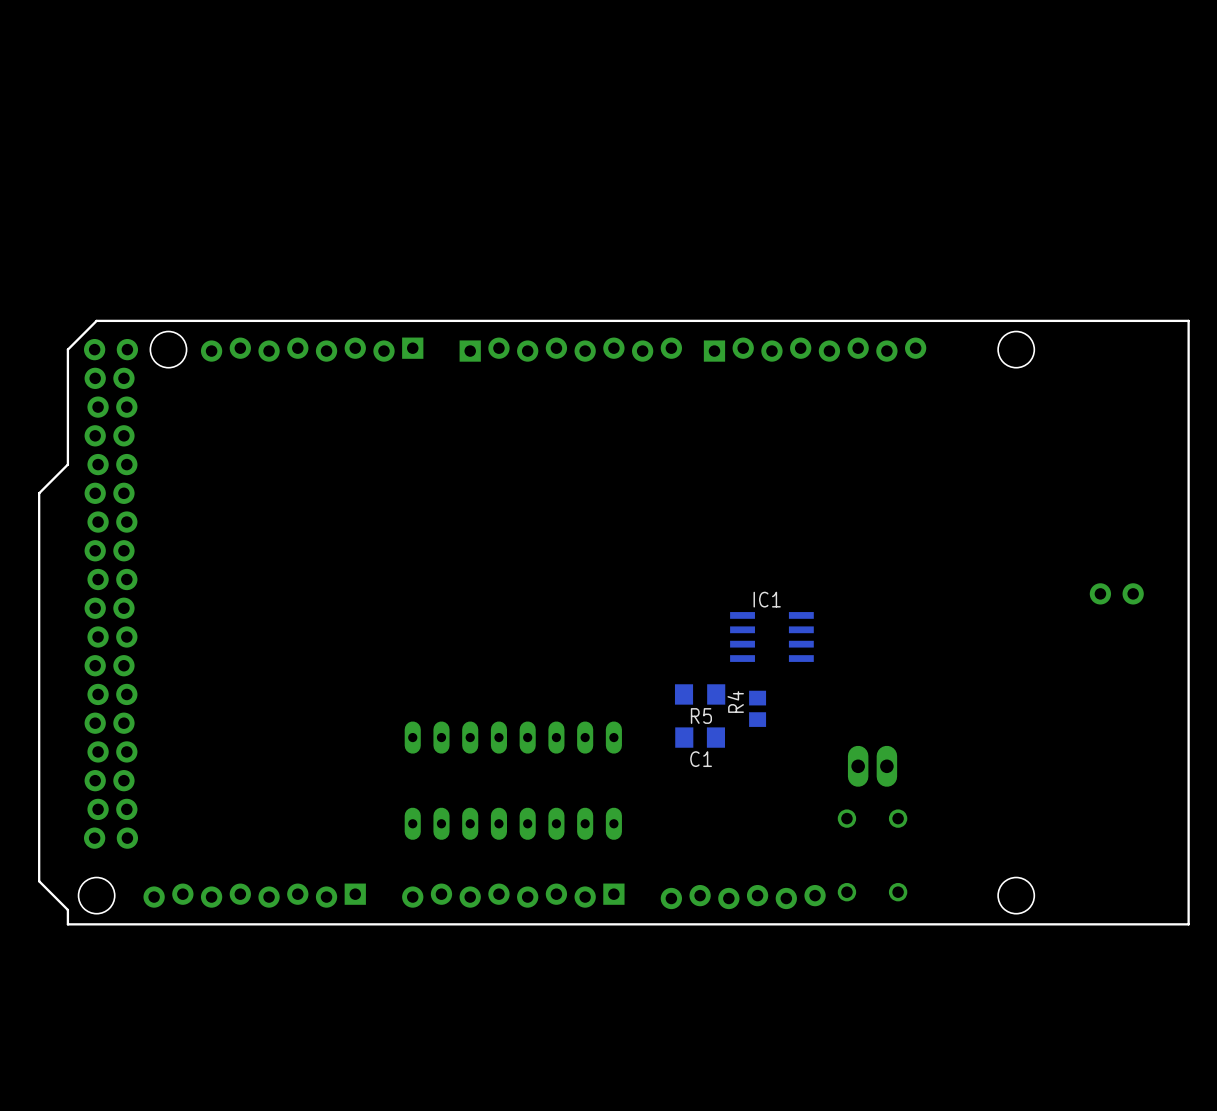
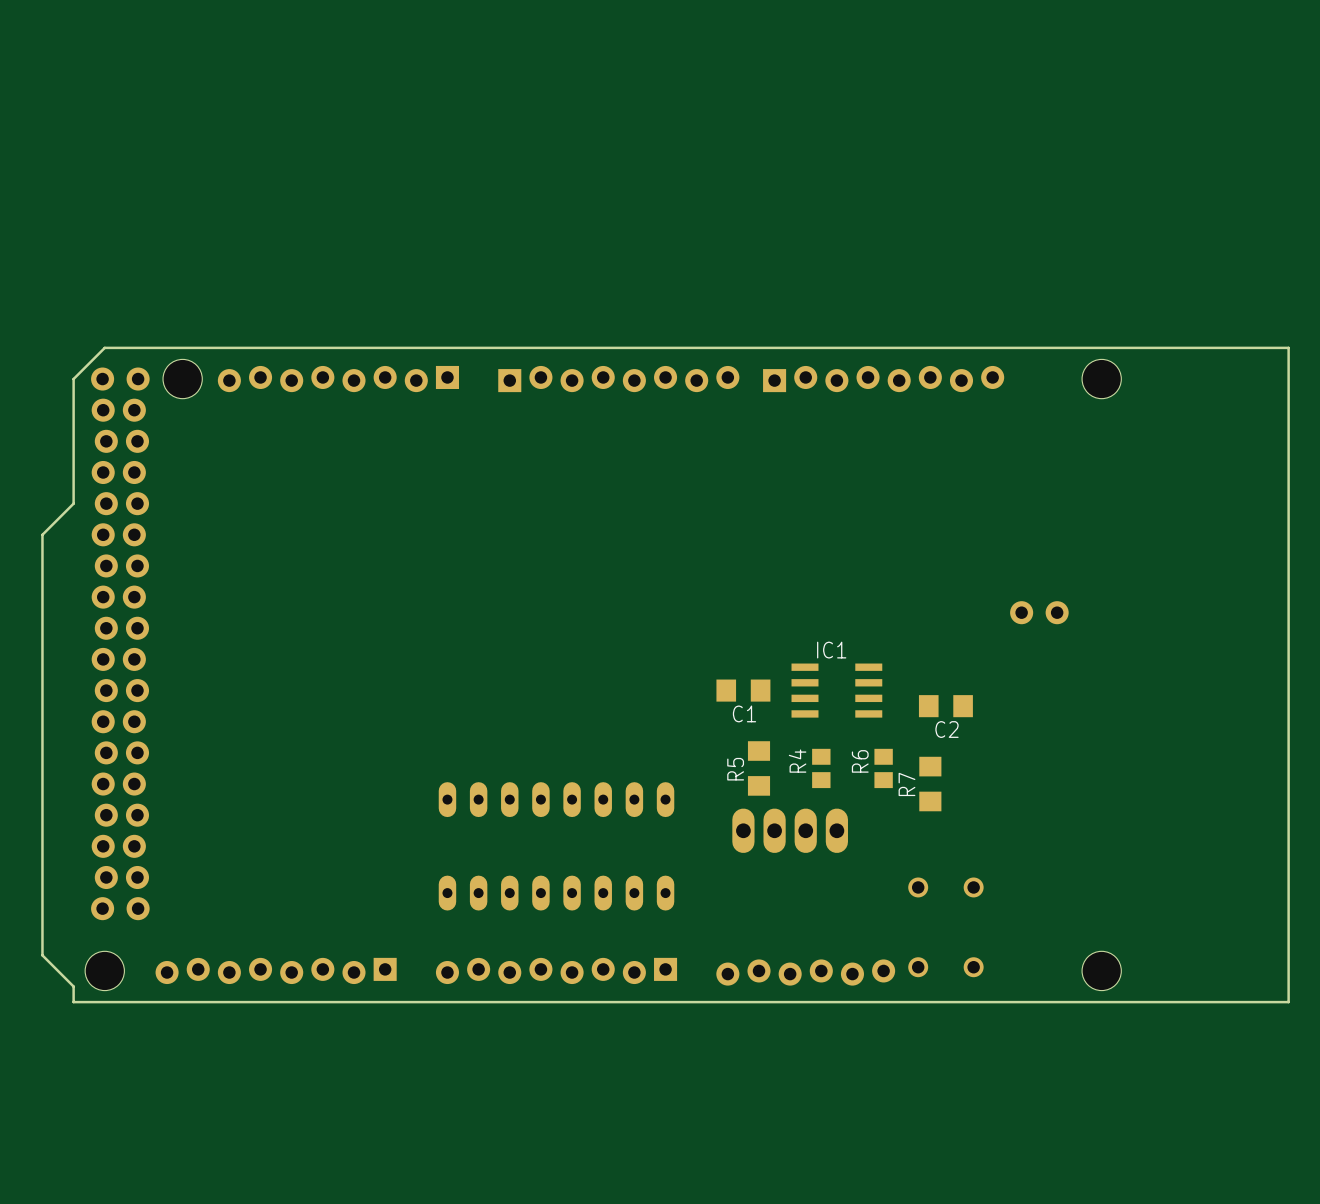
part position: (1116, 593) -> (1039, 612)
C2: none -> (945, 706)
R5 rotation: 0° (700, 694) -> 90° clockwise (759, 768)
R6: none -> (883, 768)
R7: none -> (930, 784)
C1 position: (700, 737) -> (743, 690)
part: none -> (759, 830)
part: none -> (821, 830)
part: (872, 766) -> none

